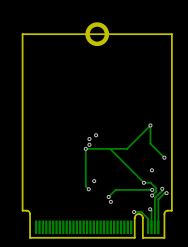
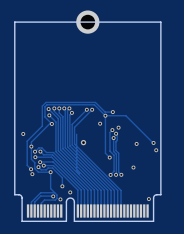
track: none -> (54, 108) (54, 111) (60, 117) (60, 149) (101, 190) (101, 211)
via: none -> (54, 108)
track: none -> (59, 108) (59, 113) (62, 116) (62, 148) (104, 190) (104, 211)
via: none -> (59, 108)
track: none -> (64, 108) (65, 147) (107, 190) (107, 211)
via: none -> (64, 108)
track: none -> (69, 108) (67, 110) (67, 146) (111, 190) (111, 211)
via: none -> (69, 108)
track: none -> (48, 109) (58, 118) (58, 150) (97, 190) (97, 211)
via: none -> (48, 109)
track: none -> (86, 109) (72, 124) (72, 144) (117, 190) (117, 211)
via: none -> (86, 109)
track: none -> (92, 109) (74, 127) (74, 143) (121, 190) (121, 211)
via: none -> (92, 109)
via: (150, 125) -> none
track: none -> (71, 112) (69, 114) (69, 145) (114, 190) (114, 211)
via: none -> (71, 112)
track: none -> (112, 112) (105, 112) (95, 102) (46, 102) (42, 106) (42, 126) (27, 141) (27, 165) (31, 169)
via: none -> (112, 112)
track: none -> (49, 115) (55, 122) (55, 151) (94, 190) (94, 211)
via: none -> (49, 115)
track: none -> (105, 115) (125, 115) (154, 143)
track: none -> (105, 115) (94, 104) (46, 104) (44, 106) (44, 117) (51, 123) (49, 123) (31, 142) (31, 159) (38, 172) (50, 172) (50, 188) (56, 194) (56, 198) (44, 200) (41, 203) (41, 211)
track: none -> (105, 115) (105, 153) (109, 157)
via: none -> (105, 115)
via: (96, 135) -> none
via: none -> (51, 123)
via: none -> (100, 123)
via: (89, 139) -> none
via: none -> (118, 127)
via: (89, 144) -> none
track: none -> (112, 130) (109, 132) (109, 151) (114, 155) (114, 171) (110, 174)
via: none -> (112, 130)
via: none -> (23, 133)
track: (85, 148) (127, 148) (150, 125) (150, 143) (164, 157) -> none
via: (85, 148) -> none
track: (110, 148) (143, 182) (150, 182) (155, 188) (155, 191) (152, 195) -> none
track: none -> (116, 133) (118, 172) (121, 174)
via: none -> (116, 133)
track: none -> (113, 138) (113, 151) (116, 154) (115, 174)
via: none -> (113, 138)
via: none -> (83, 142)
via: none -> (136, 143)
via: none -> (31, 146)
via: none -> (156, 150)
track: none -> (35, 151) (41, 147) (46, 152) (53, 152) (91, 190) (91, 211)
via: none -> (35, 151)
track: none -> (40, 151) (43, 154) (52, 154) (87, 190) (87, 211)
via: none -> (40, 151)
via: (151, 170) -> none
track: none -> (35, 157) (51, 157) (84, 190) (84, 211)
via: none -> (35, 157)
via: none -> (109, 157)
track: none -> (40, 162) (53, 161) (81, 190) (81, 211)
via: none -> (40, 162)
track: none -> (43, 165) (53, 165) (77, 190) (77, 211)
via: none -> (43, 165)
via: (94, 181) -> none
track: none -> (38, 167) (41, 169) (52, 168) (62, 177) (62, 186)
via: none -> (38, 167)
via: none -> (31, 169)
via: none -> (50, 172)
track: (162, 188) (154, 198) (154, 227) -> none
via: (162, 188) -> none
via: none -> (32, 174)
via: (88, 189) -> none
track: (152, 189) (115, 189) (108, 196) -> none
via: (152, 189) -> none
via: none -> (110, 174)
via: none -> (116, 174)
via: none -> (121, 174)
track: (166, 193) (158, 199) (158, 227) -> none
via: (166, 193) -> none
via: (152, 195) -> none
via: (108, 196) -> none
via: (110, 201) -> none
via: none -> (62, 186)
track: none -> (54, 192) (40, 192) (31, 202) (31, 211)
via: none -> (70, 192)
track: (150, 209) (151, 227) -> none
via: (150, 209) -> none
part footprint: [22, 210, 172, 238] -> [14, 194, 161, 222]
track: none -> (53, 196) (40, 196) (34, 202) (34, 211)
via: none -> (53, 196)
track: (134, 212) (141, 212) (148, 218) (148, 227) -> none
via: (134, 212) -> none
via: none -> (60, 199)
via: none -> (148, 199)

